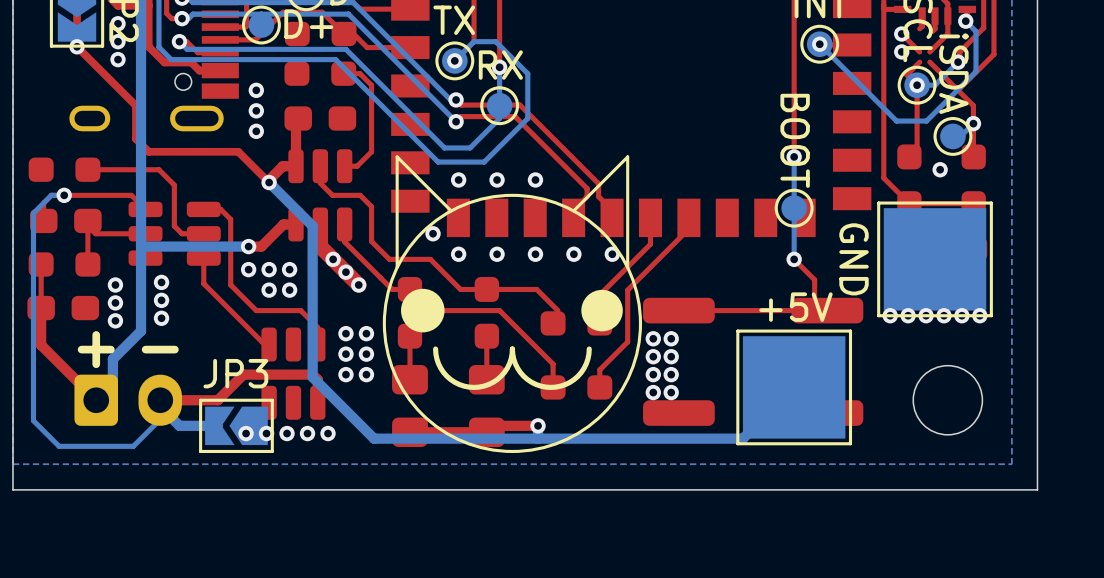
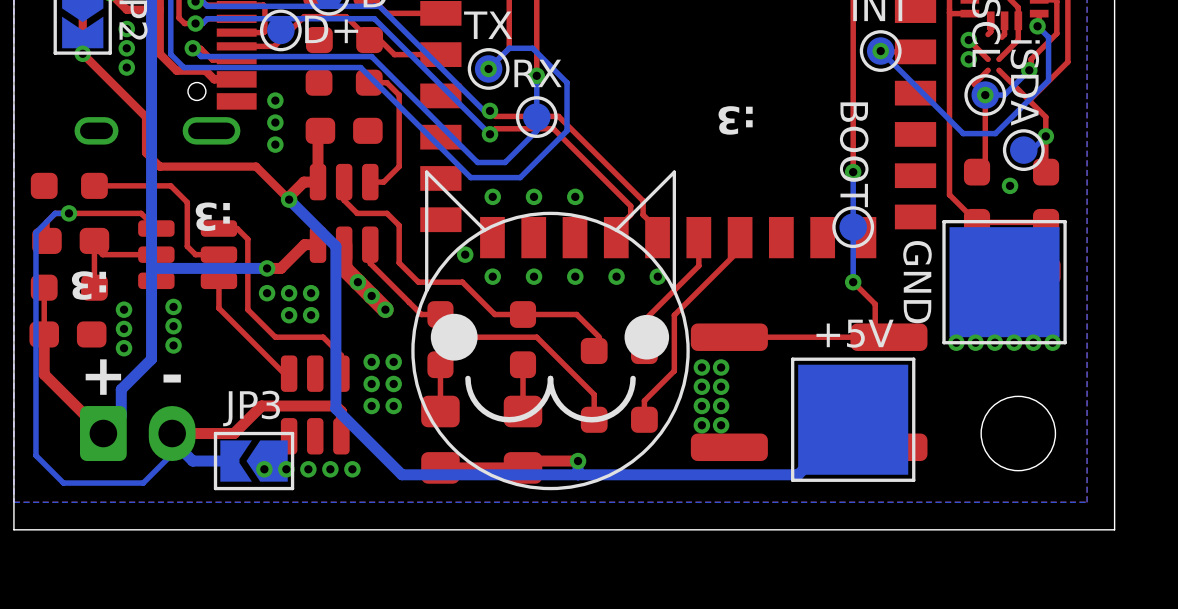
text: none -> :3 (735, 120)
text: none -> :3 (212, 216)
text: none -> :3 (88, 285)

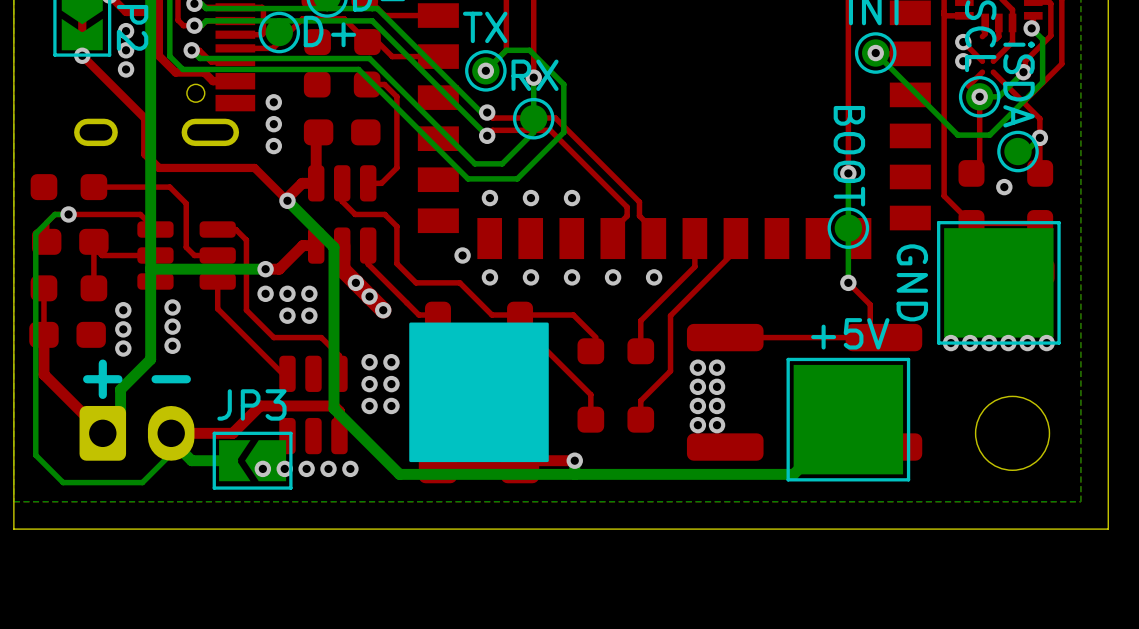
text: :3 (735, 120) -> none
drawing: [411, 170, 690, 491] -> none
text: :3 (212, 216) -> none
text: :3 (88, 285) -> none
drawing: none -> [409, 322, 549, 463]

